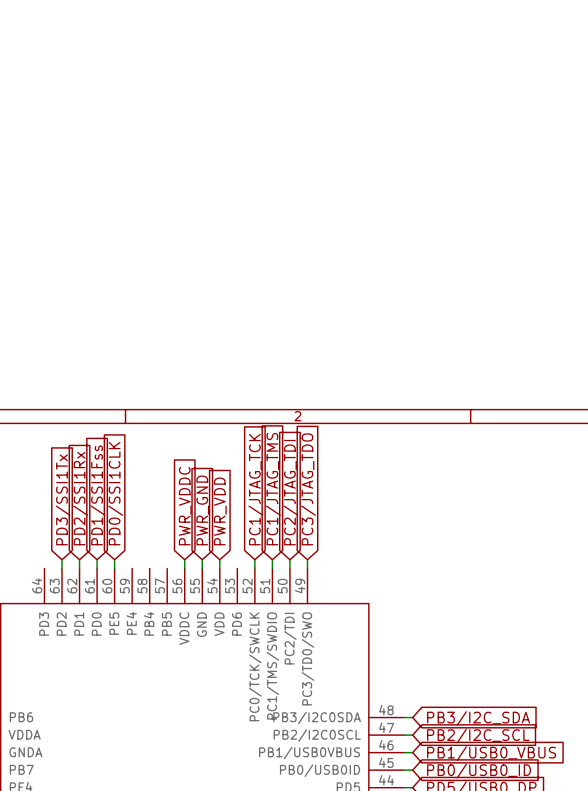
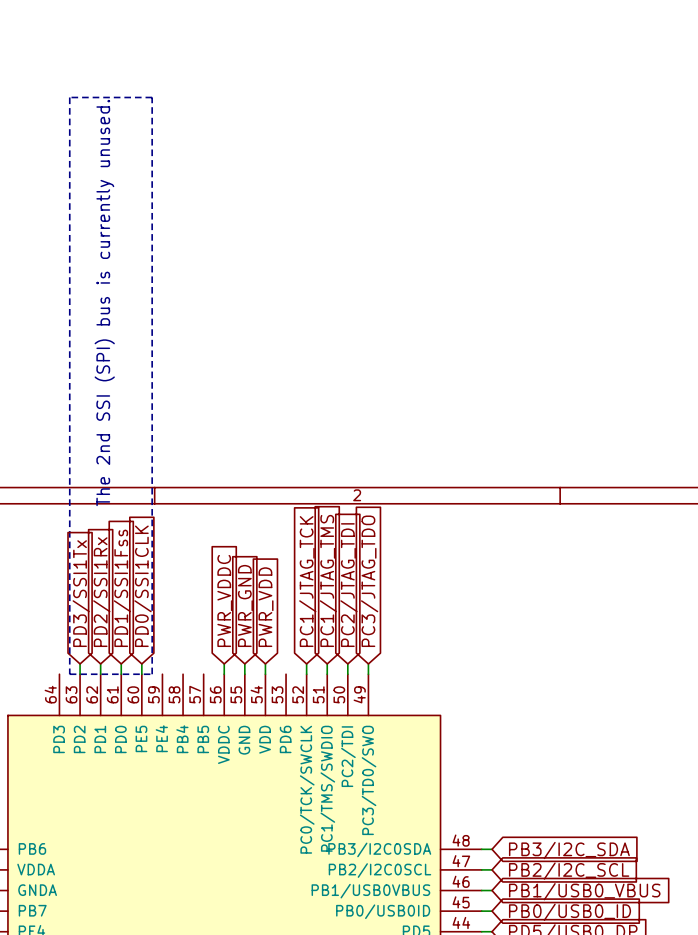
line: none -> (69, 97) (69, 674) (152, 674) (152, 97) (69, 97)
text: none -> The 2nd SSI (SPI) bus is currently unused. (104, 302)

